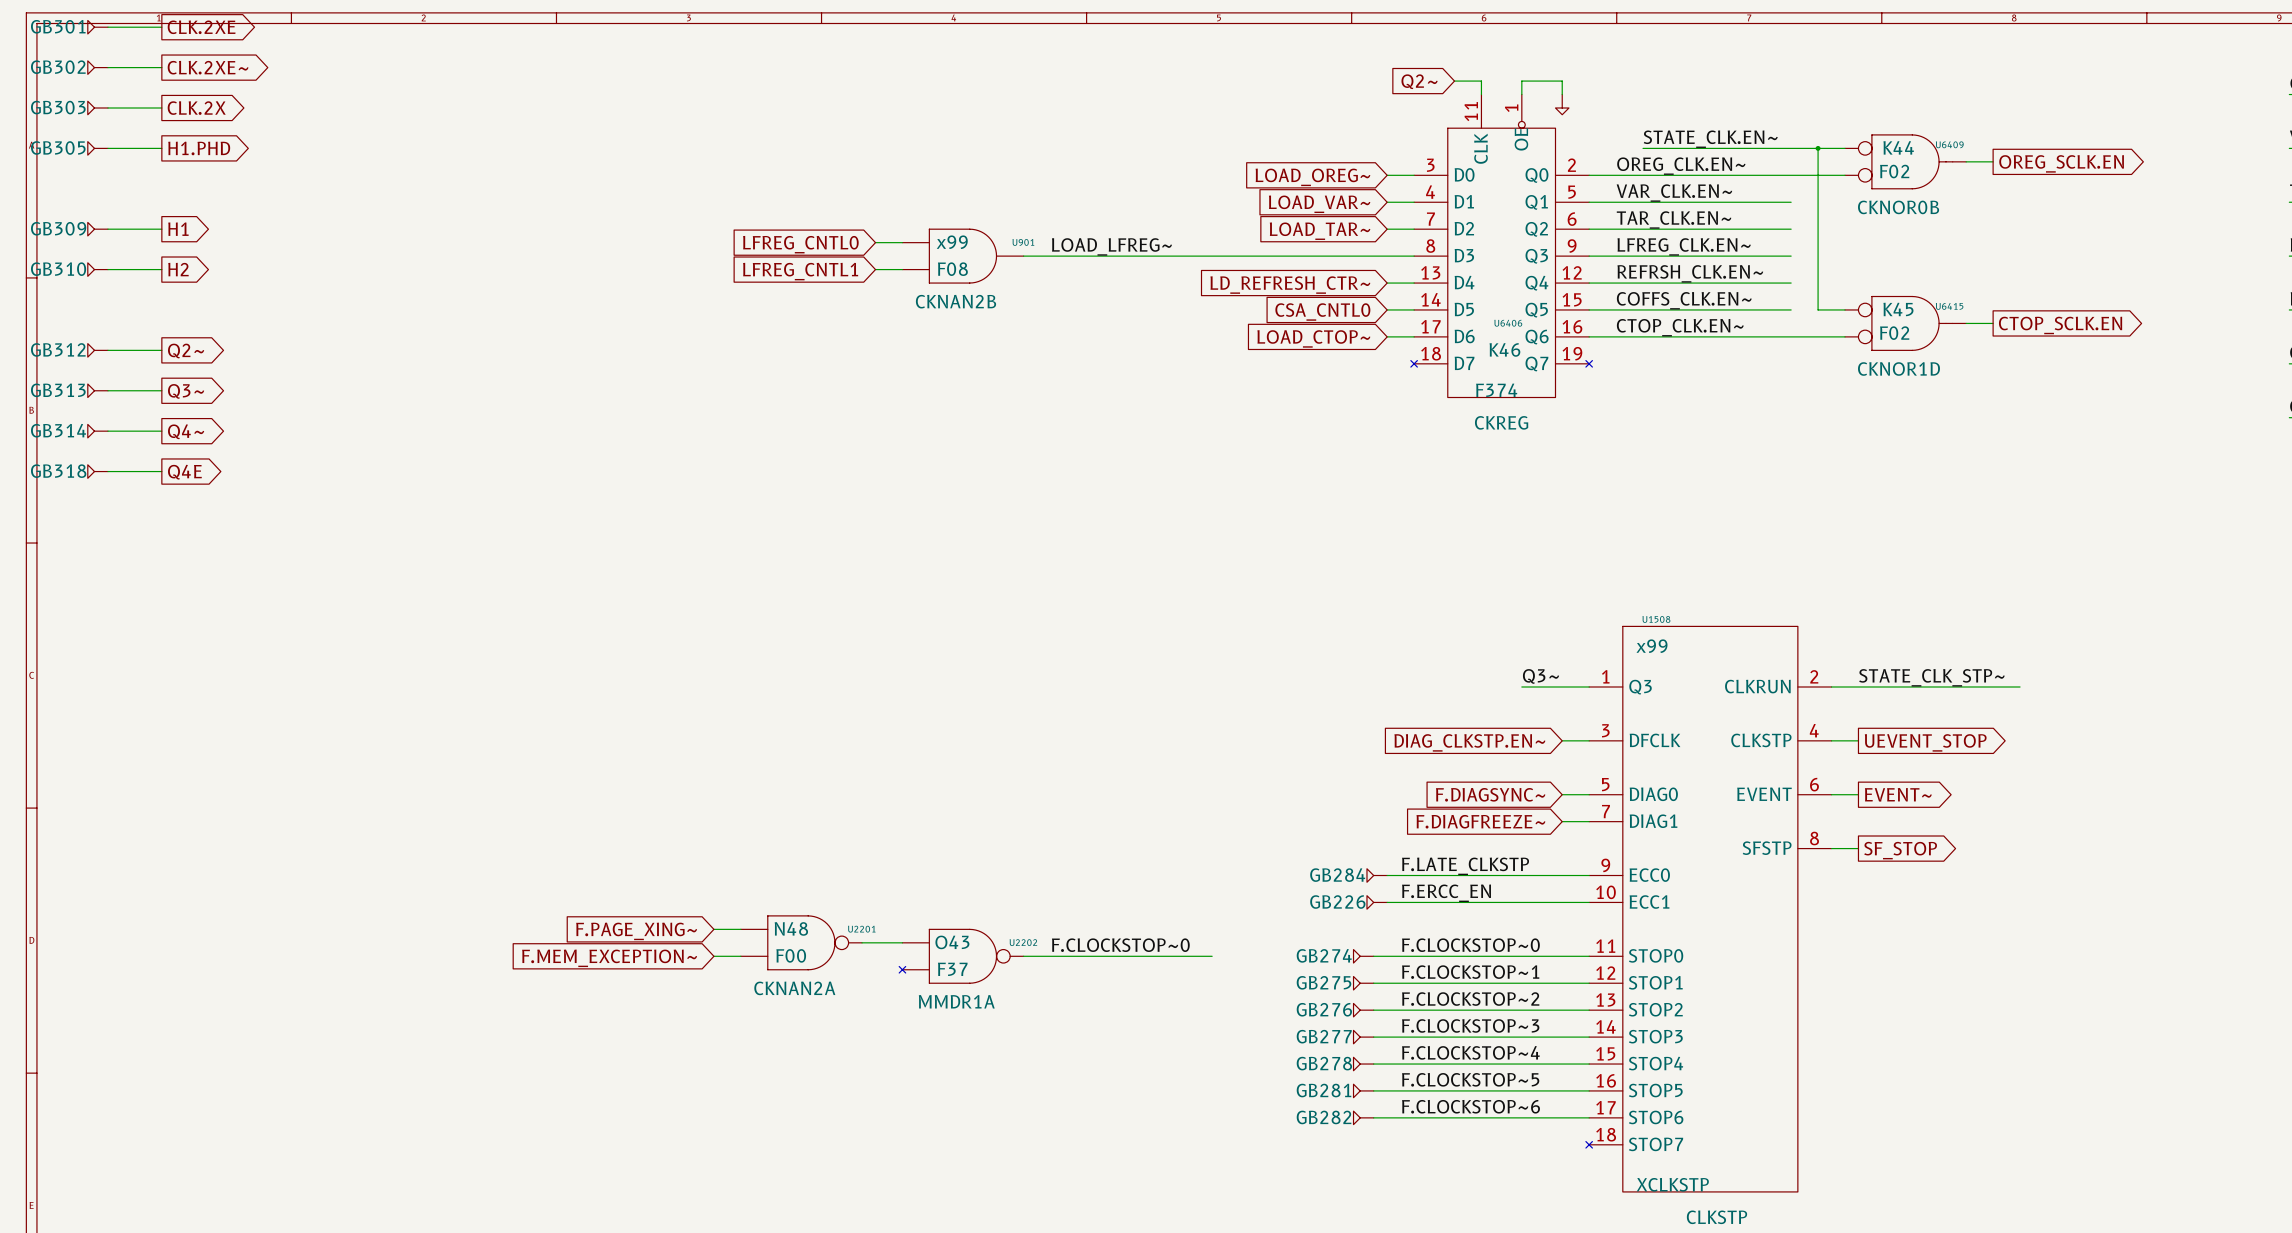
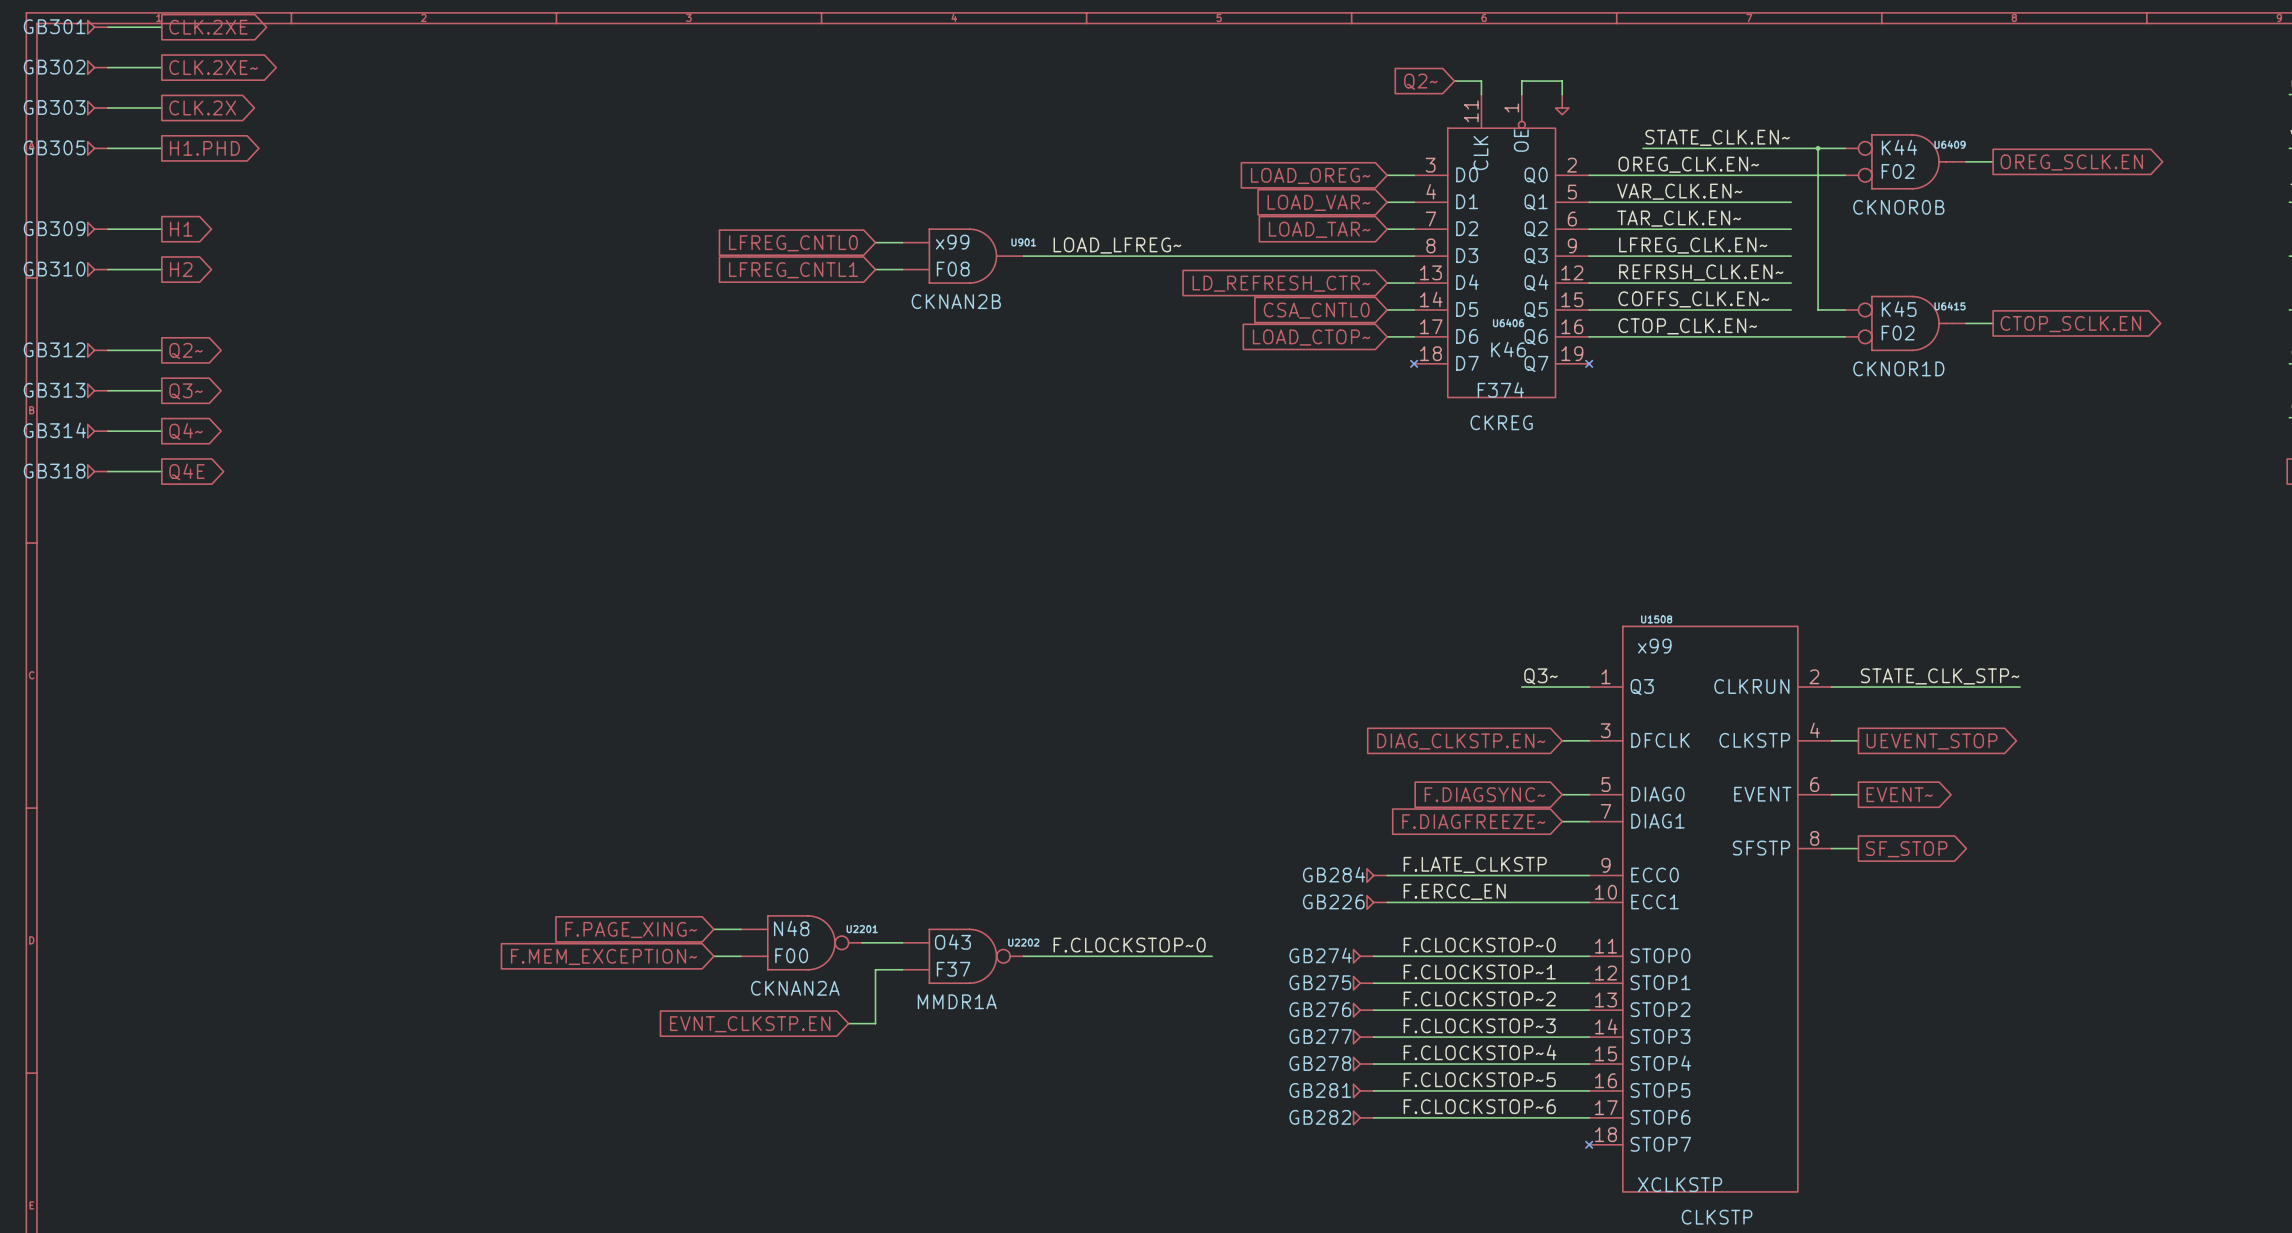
wire: none -> (902, 969) (875, 969) (875, 1023) (848, 1023)
no-connect mark: (902, 969) -> none
global label: none -> EVNT_CLKSTP.EN (750, 1024)

